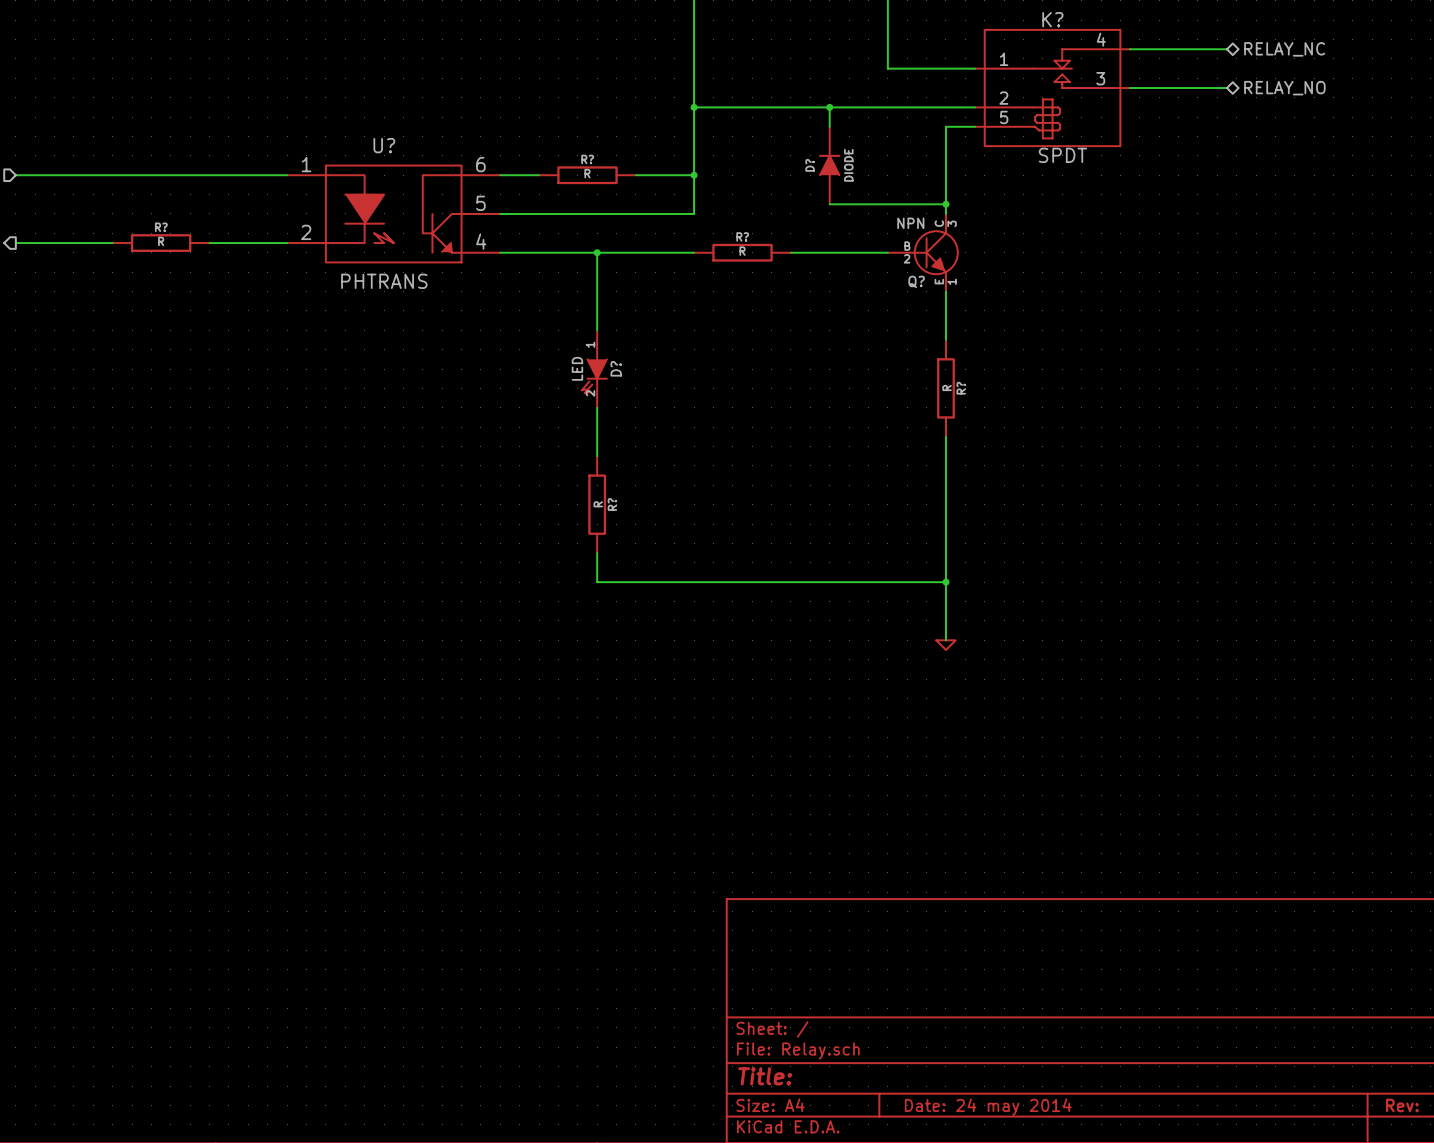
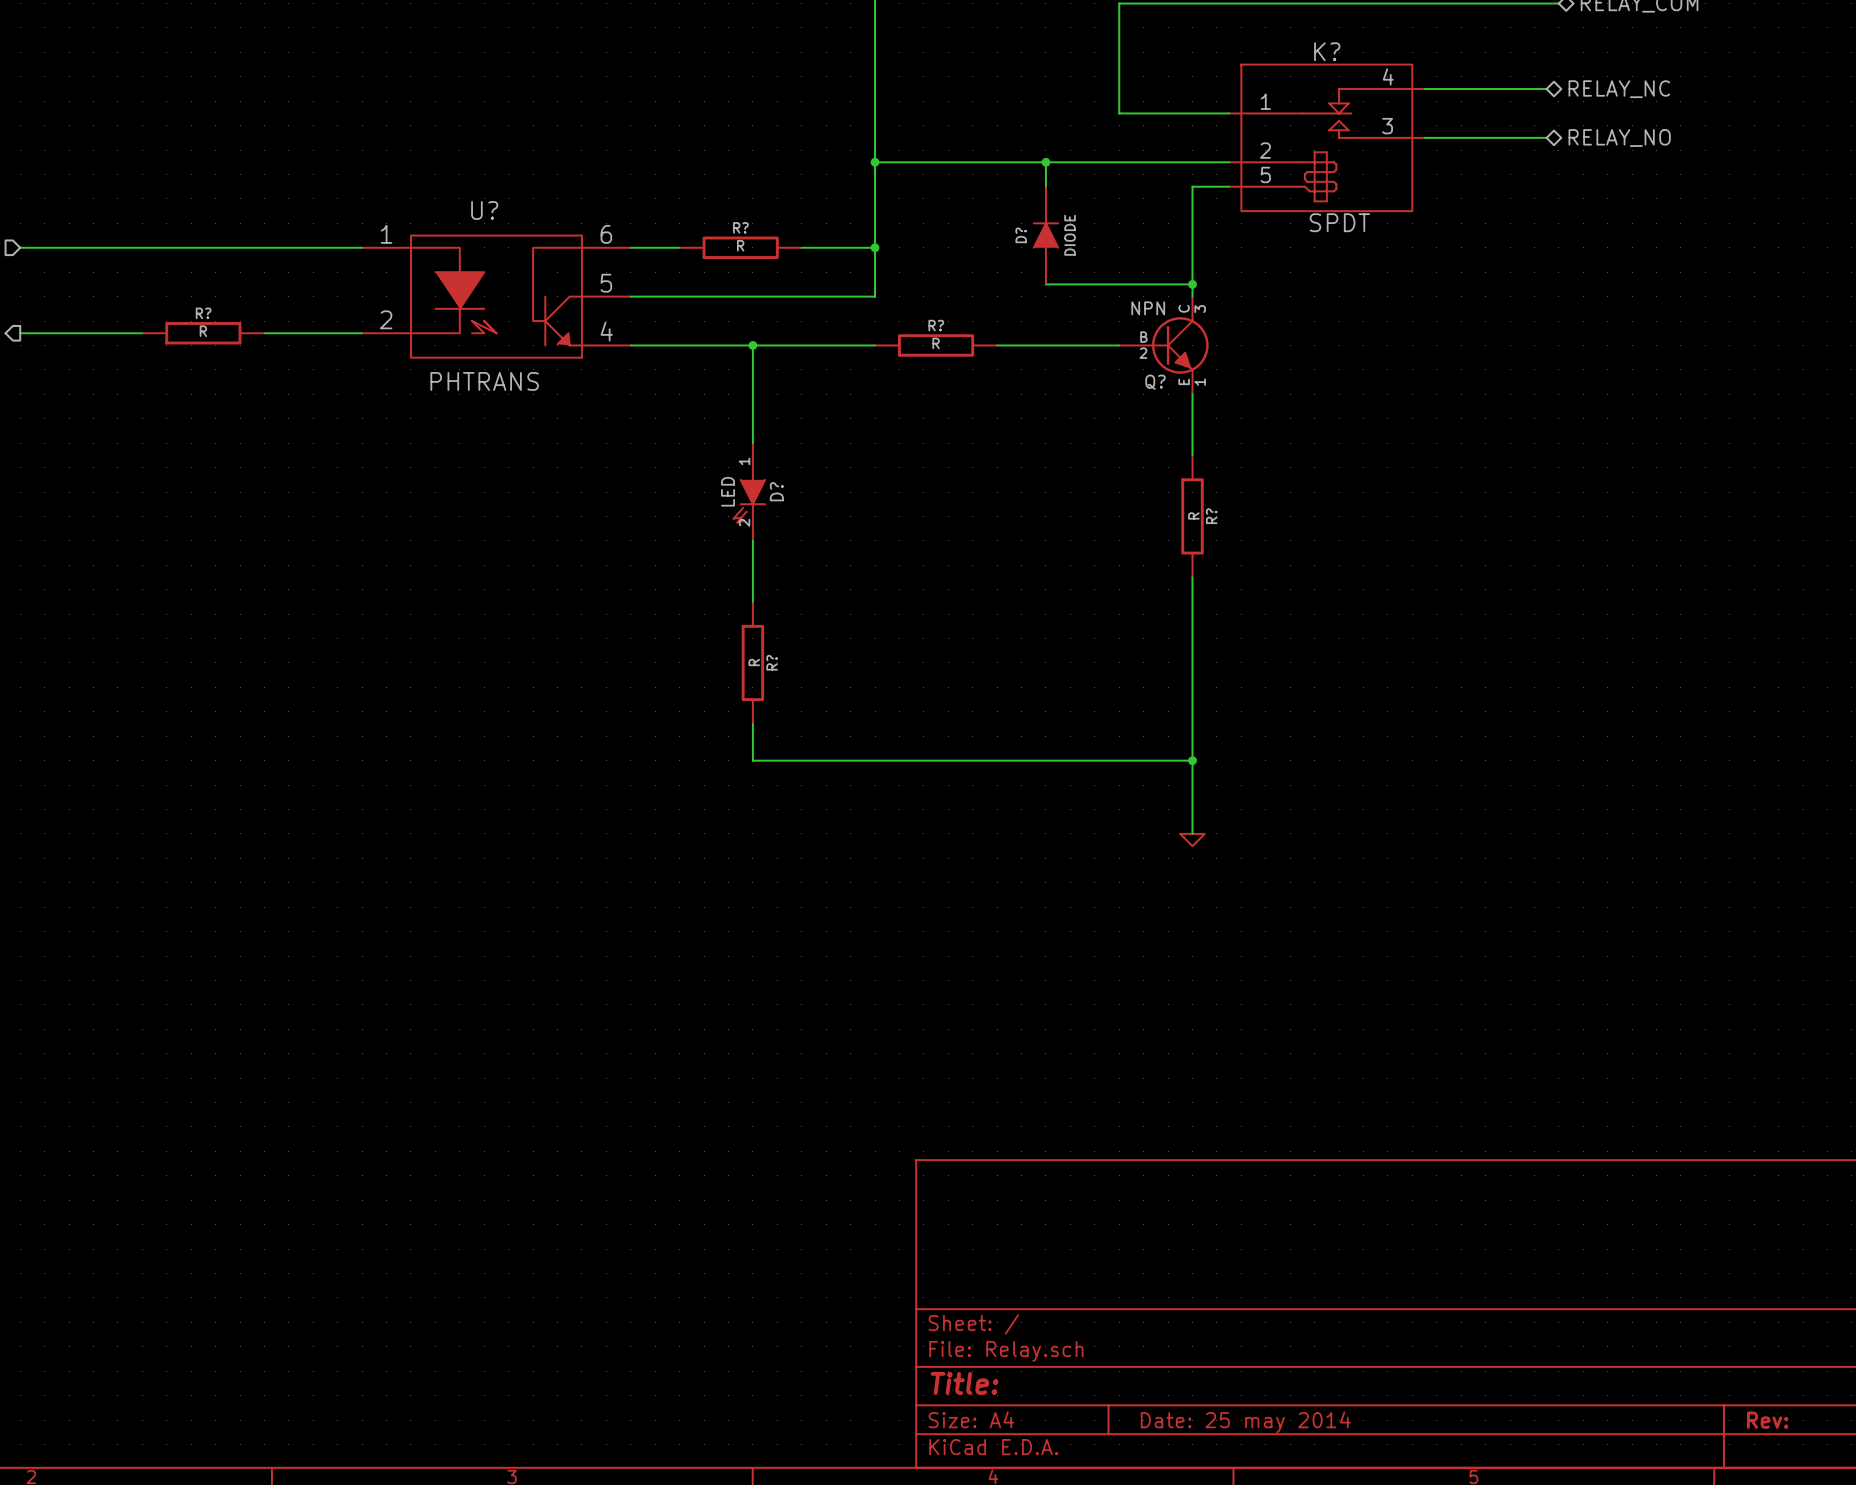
title block: Date: 24 may 2014 (988, 1107) -> Date: 25 may 2014 (1245, 1422)

